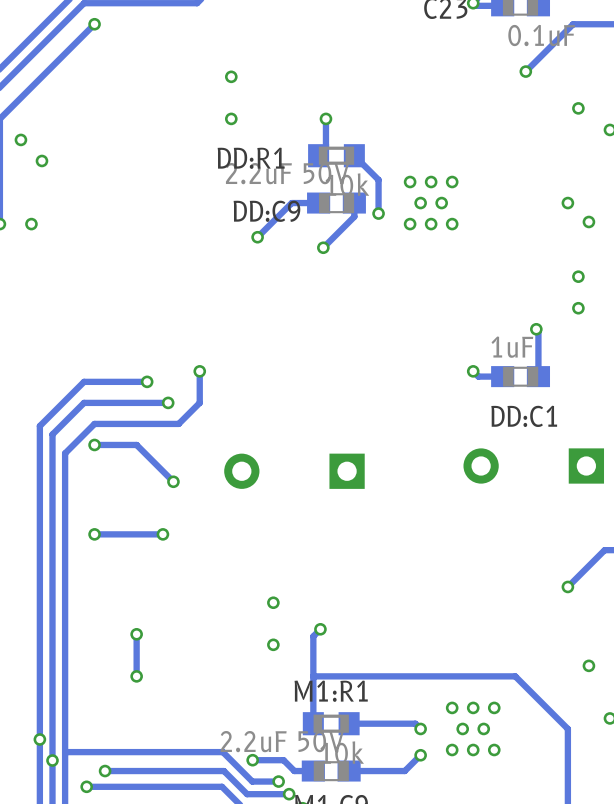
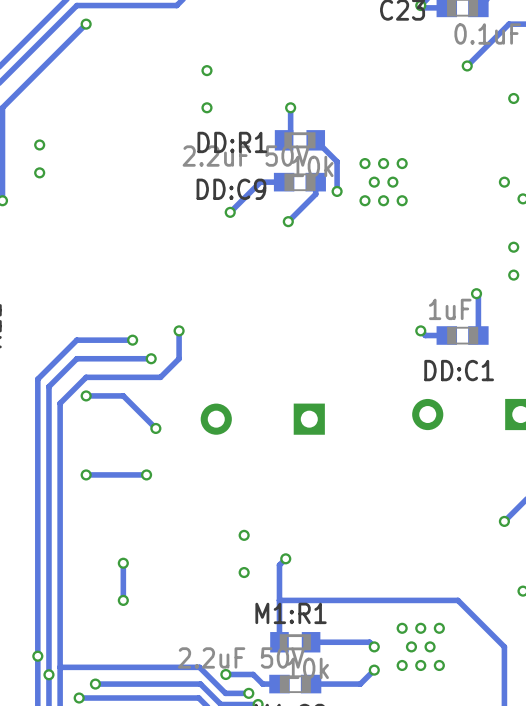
via: (20, 139) -> none
via: none -> (39, 172)
via: (31, 224) -> none

